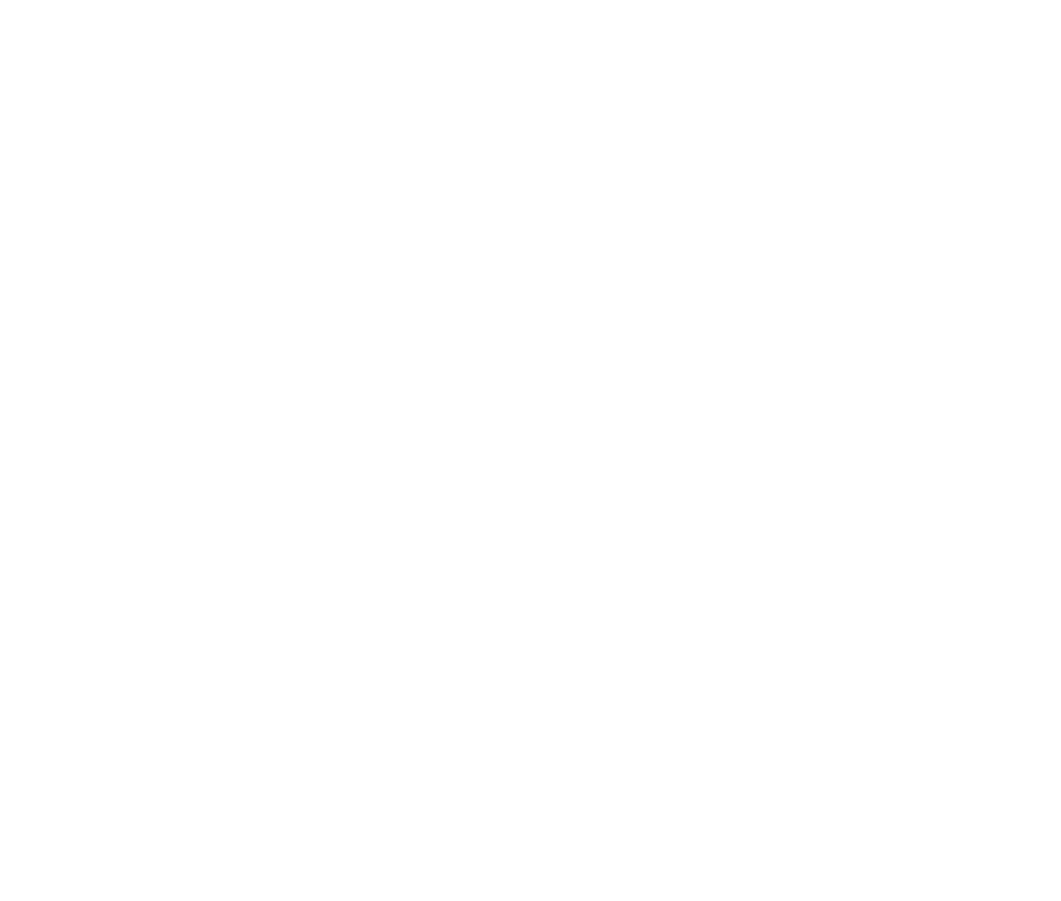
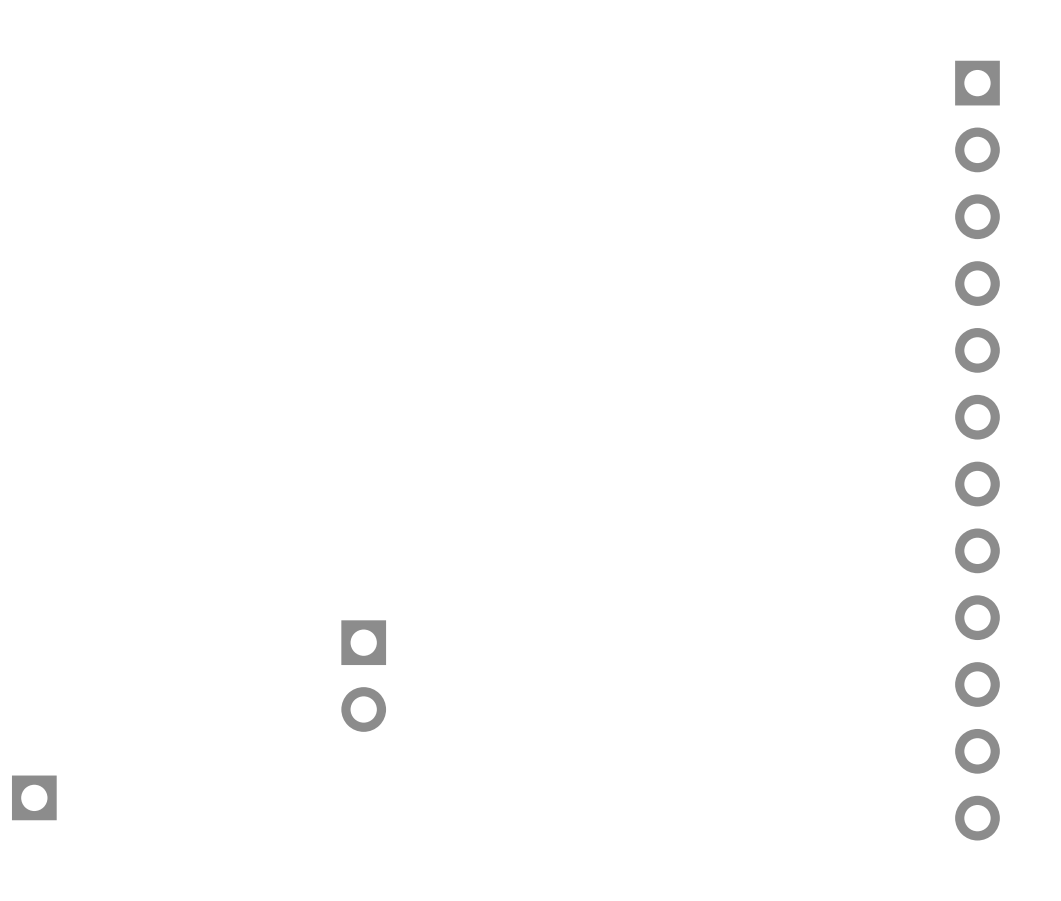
part: none -> (977, 450)
part: none -> (363, 676)
part: none -> (34, 797)

